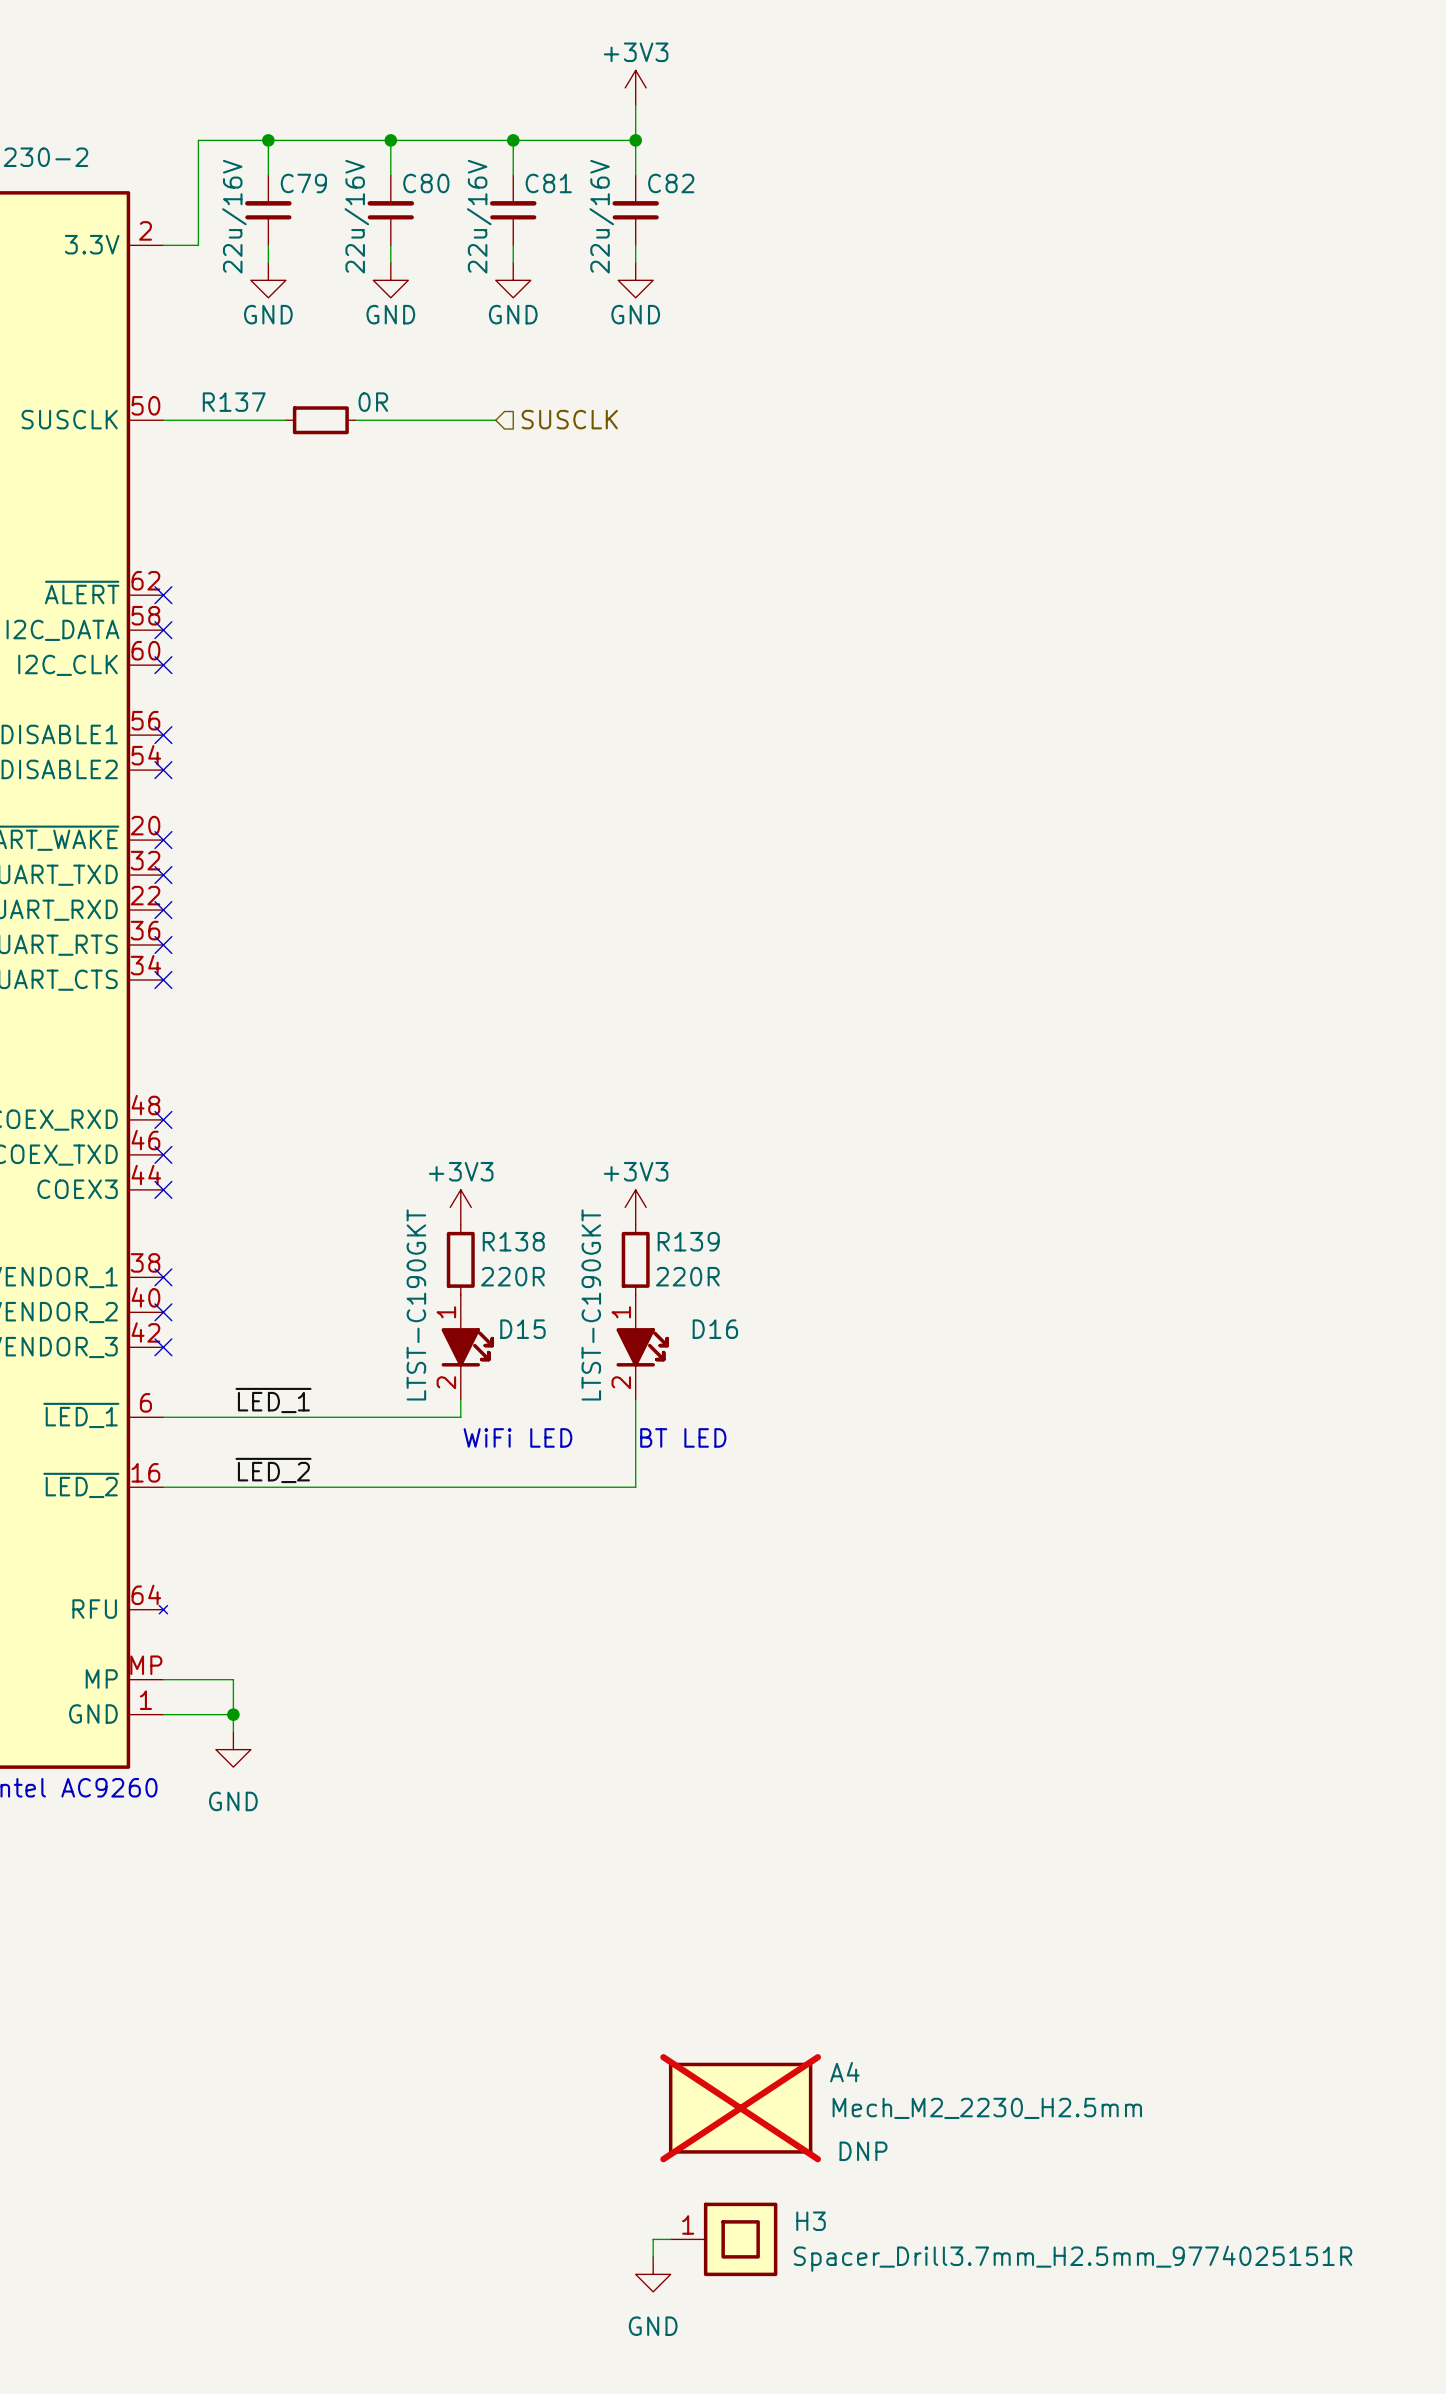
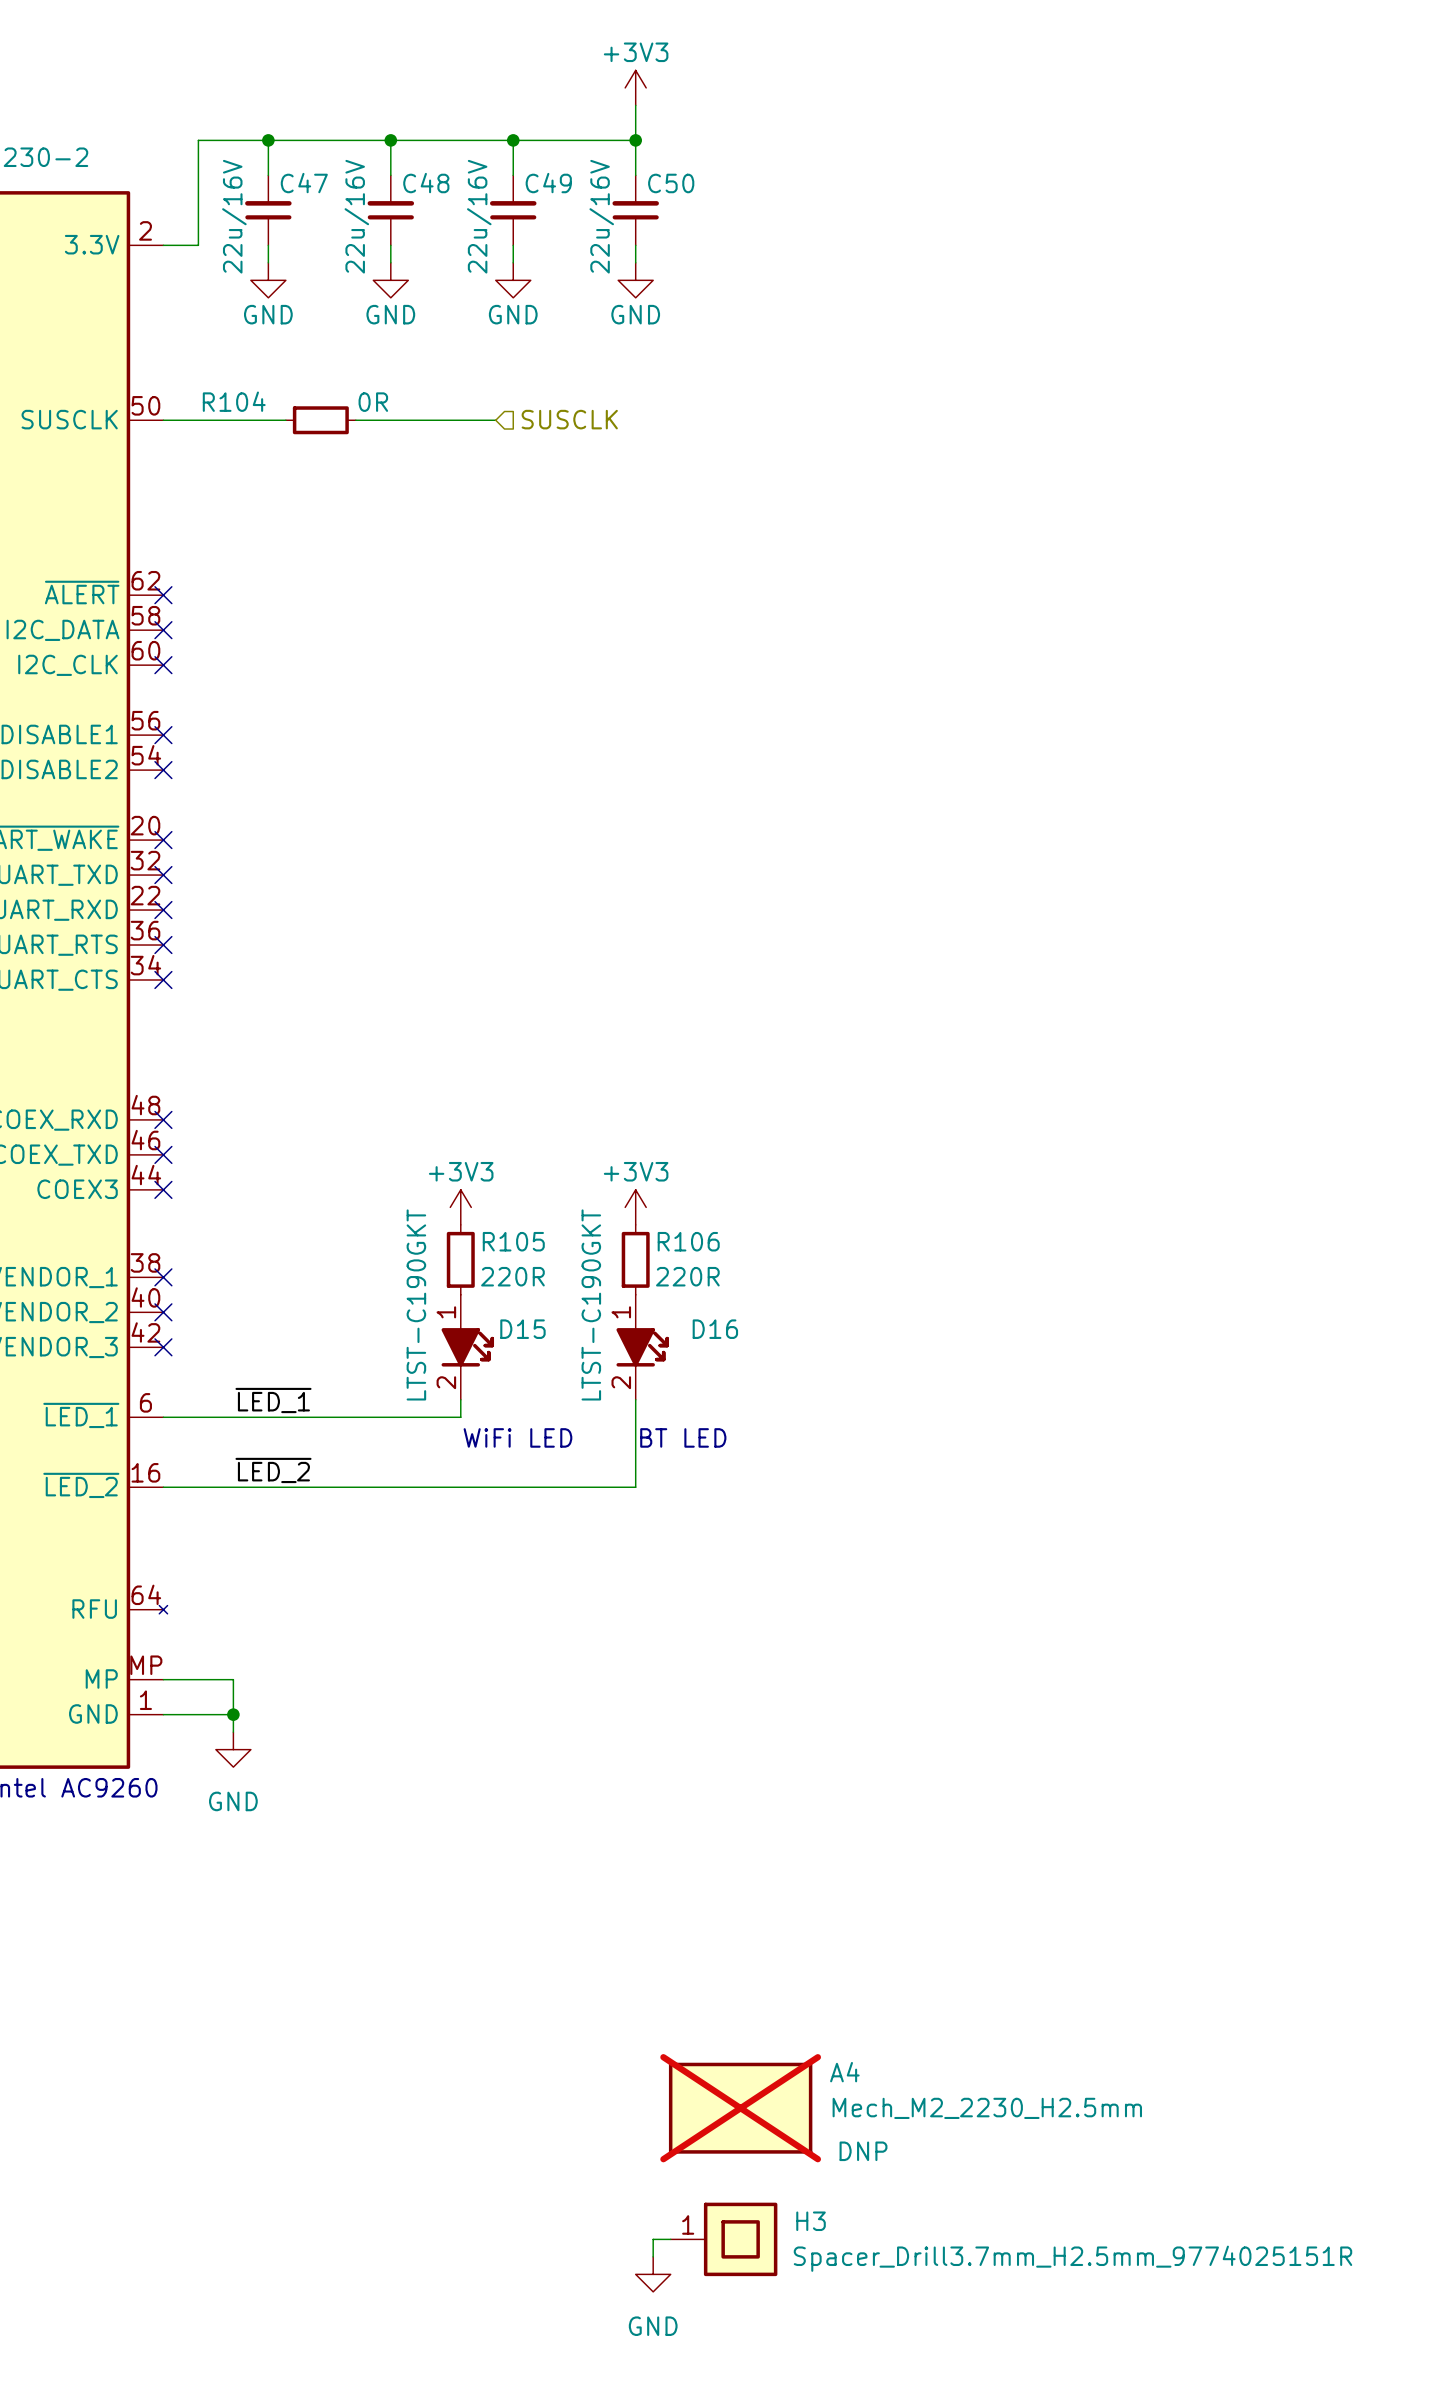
C79 name: C79 (303, 183) -> C47 (304, 183)
C80 name: C80 (426, 183) -> C48 (426, 183)
C81 name: C81 (548, 183) -> C49 (548, 183)
C82 name: C82 (671, 183) -> C50 (671, 183)
R137 name: R137 (234, 402) -> R104 (234, 401)
R138 name: R138 (513, 1241) -> R105 (513, 1241)
R139 name: R139 (688, 1241) -> R106 (688, 1241)

